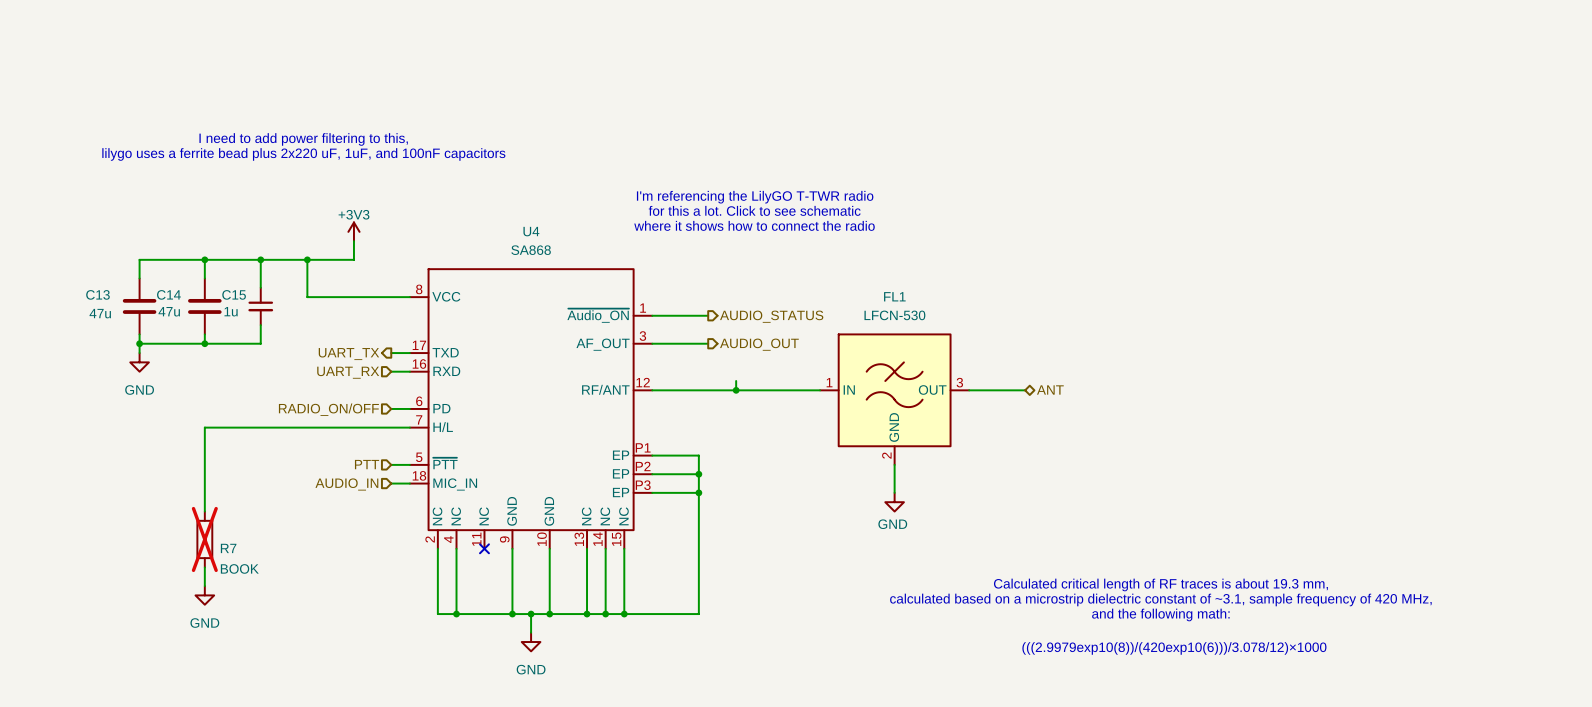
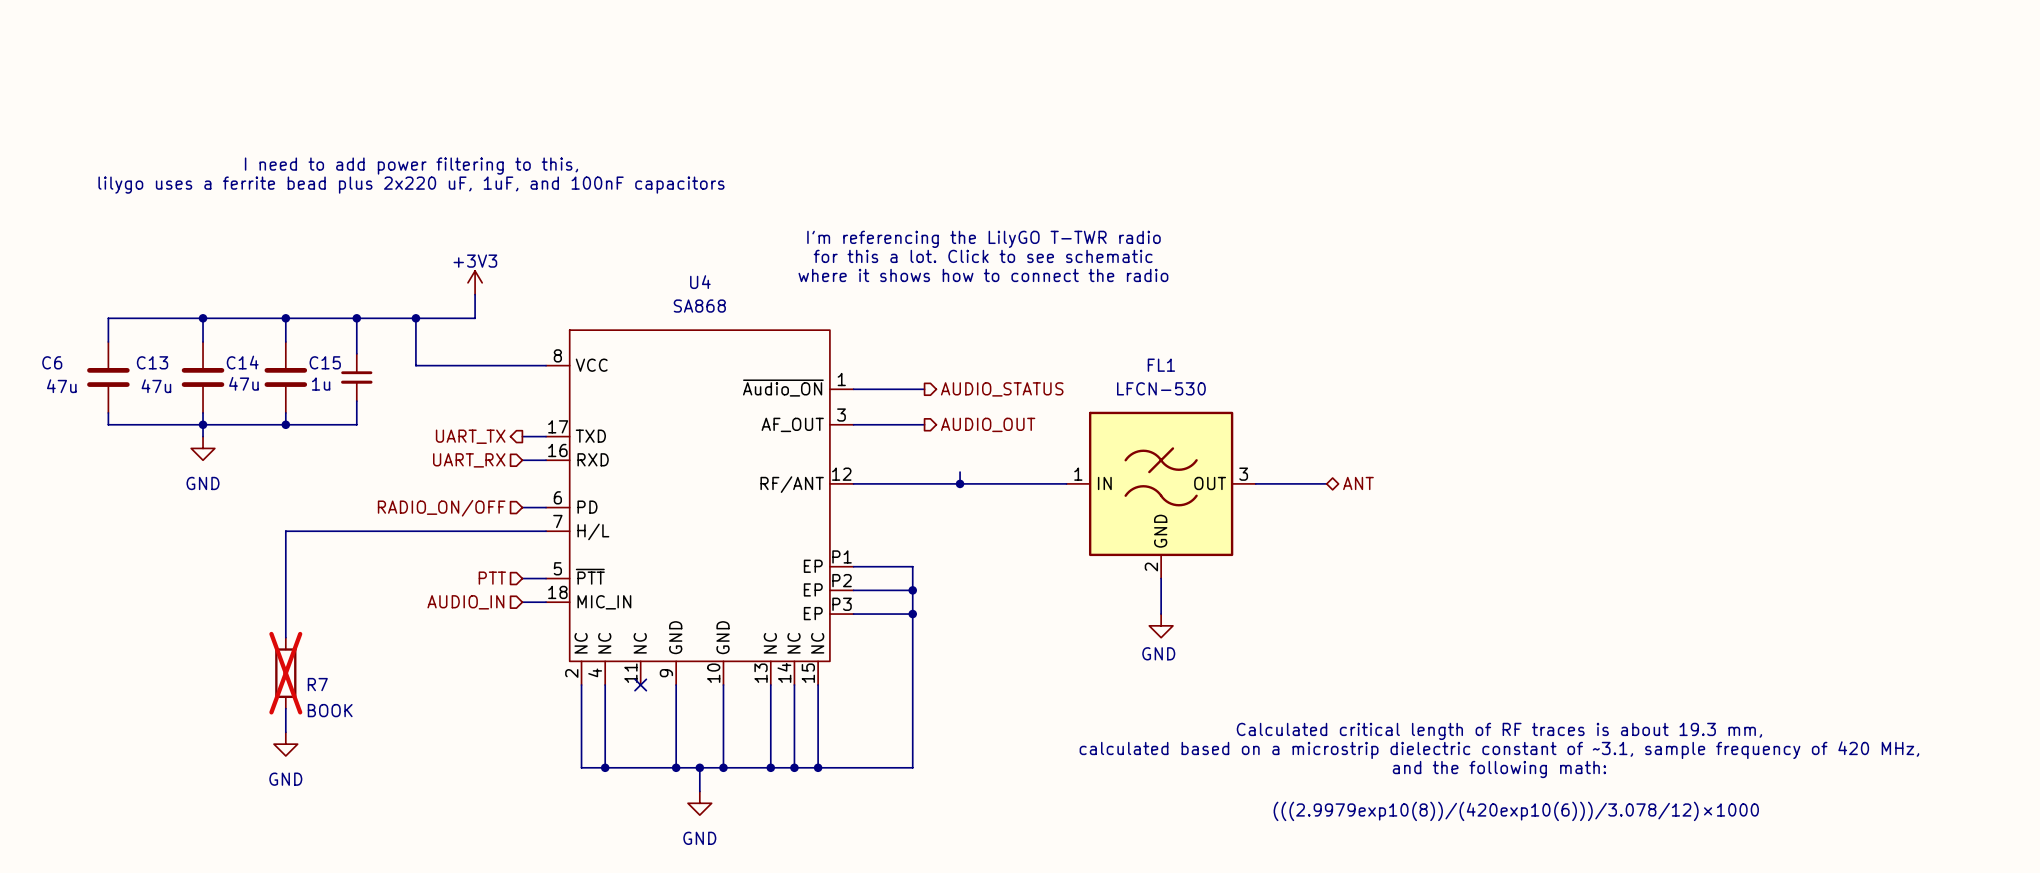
wire: none -> (203, 318) (108, 318) (108, 341)
junction: none -> (203, 318)
C6: none -> 47u (108, 377)
wire: none -> (108, 412) (108, 424) (203, 424)

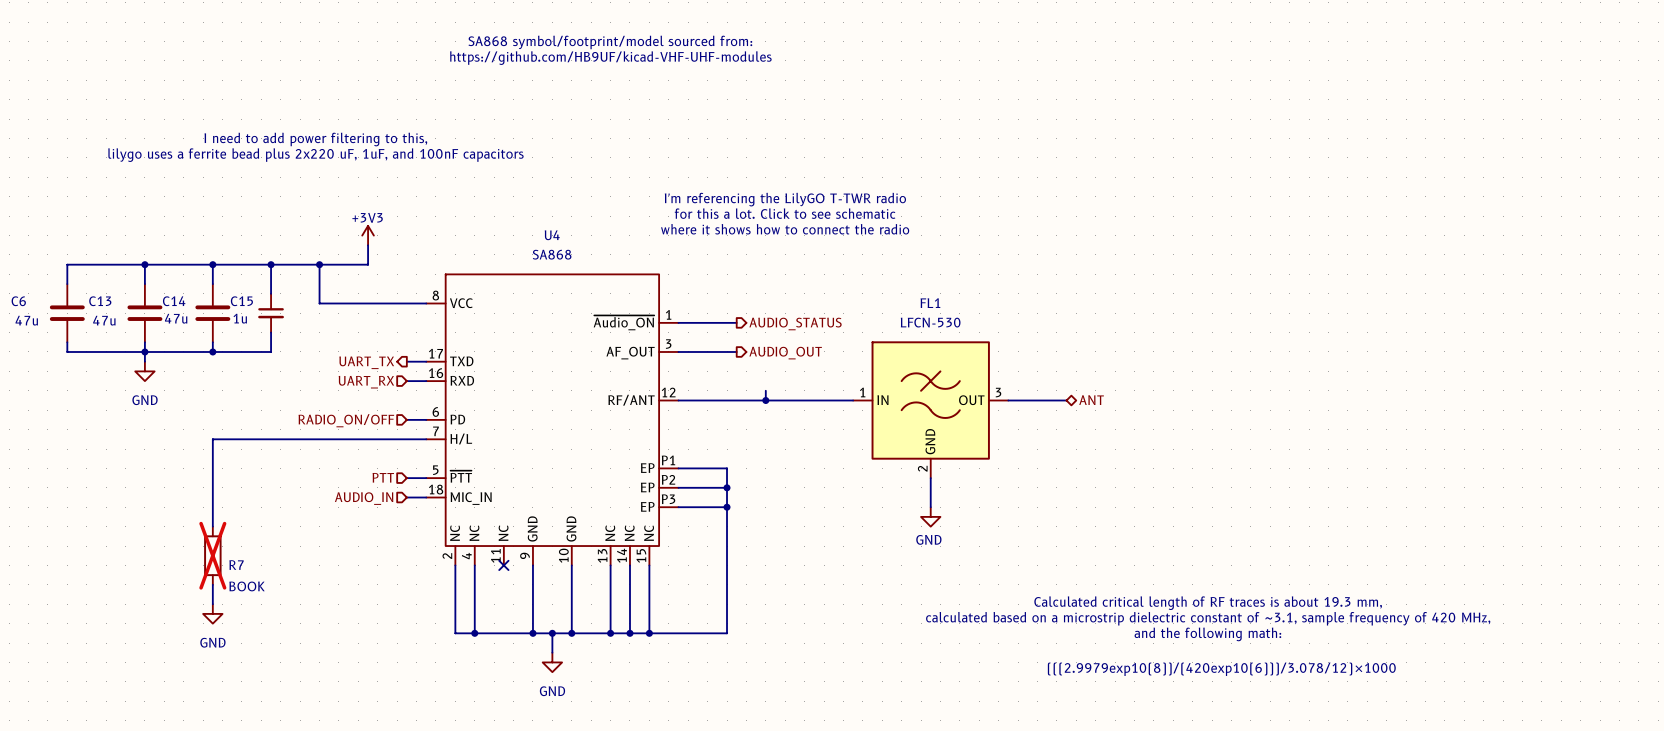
text: none -> SA868 symbol/footprint/model sourced from: (610, 42)
text: none -> https://github.com/HB9UF/kicad-VHF-UHF-modules (610, 58)

